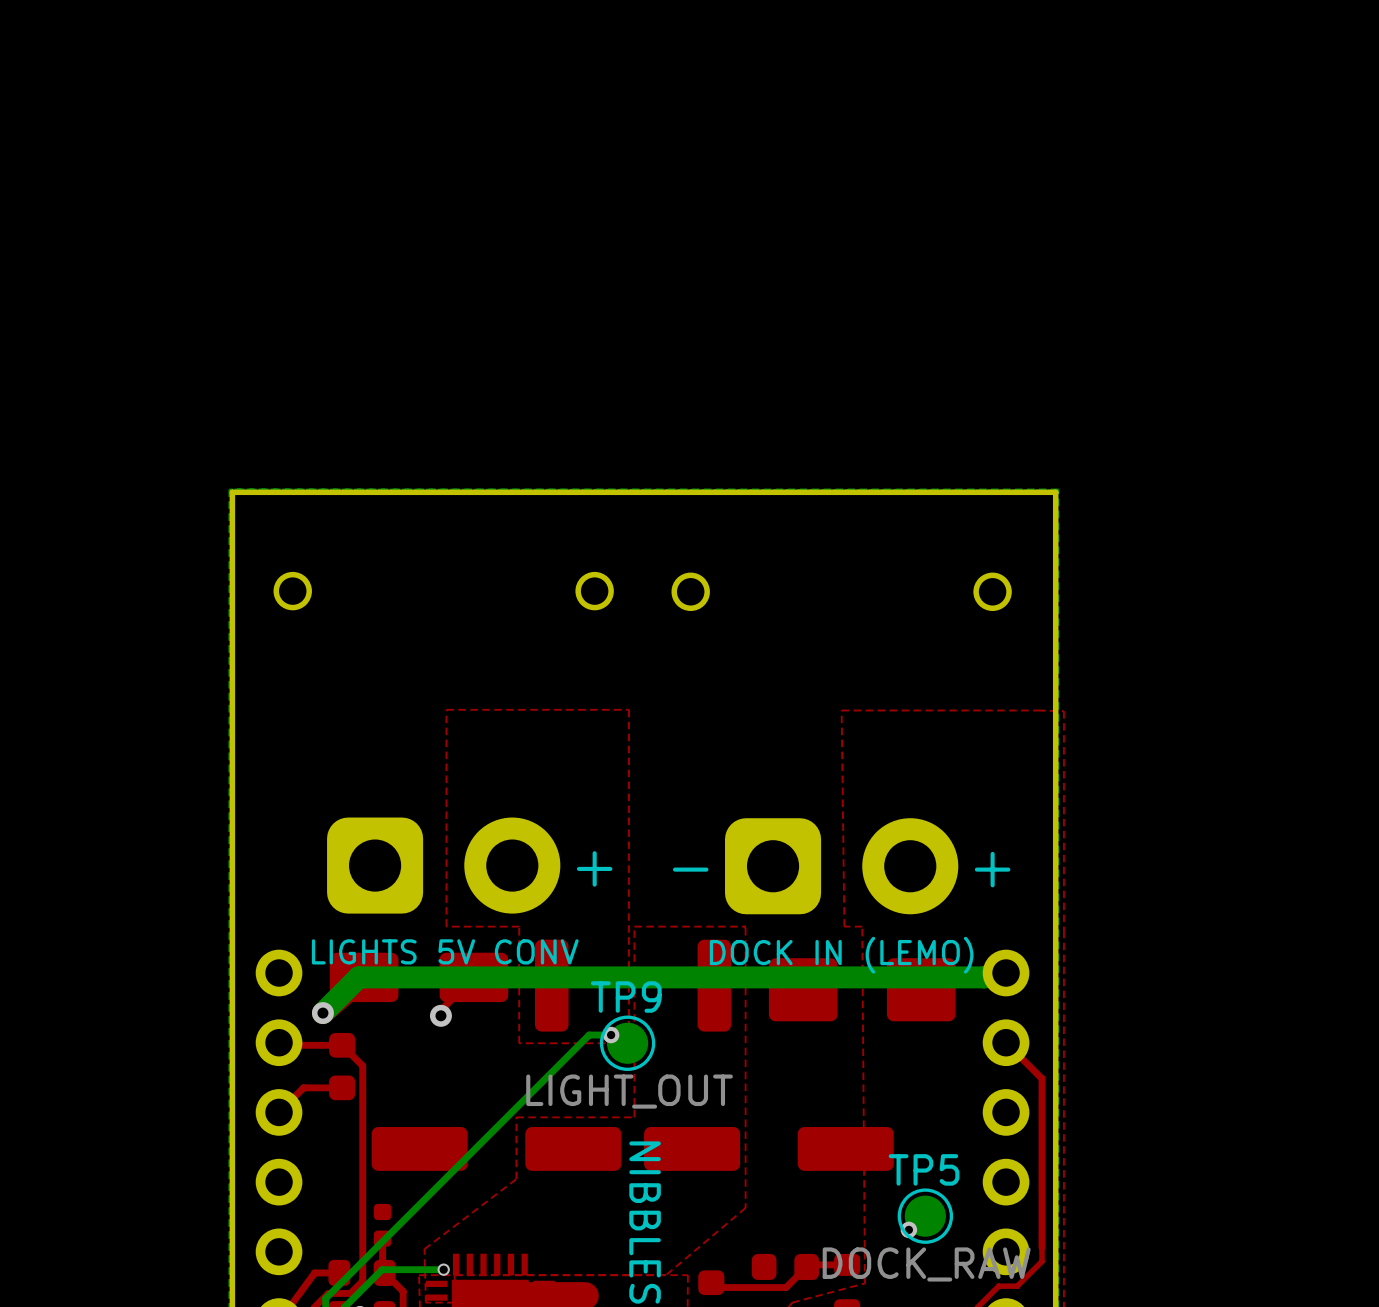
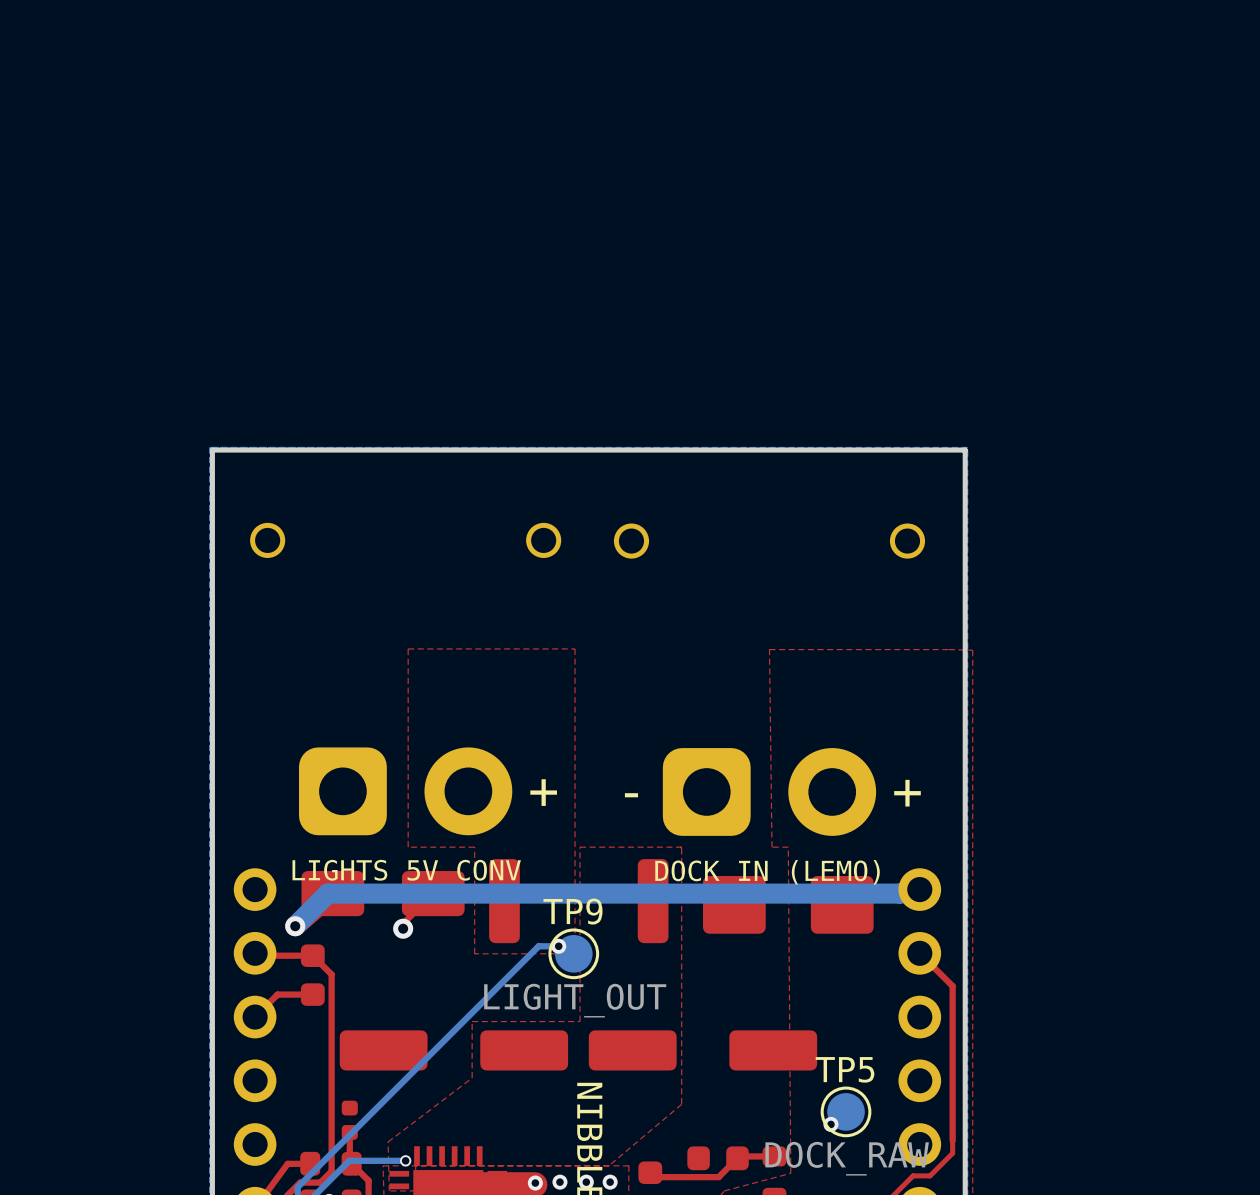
via: none -> (535, 1183)
via: none -> (559, 1182)
via: none -> (586, 1182)
via: none -> (610, 1182)

